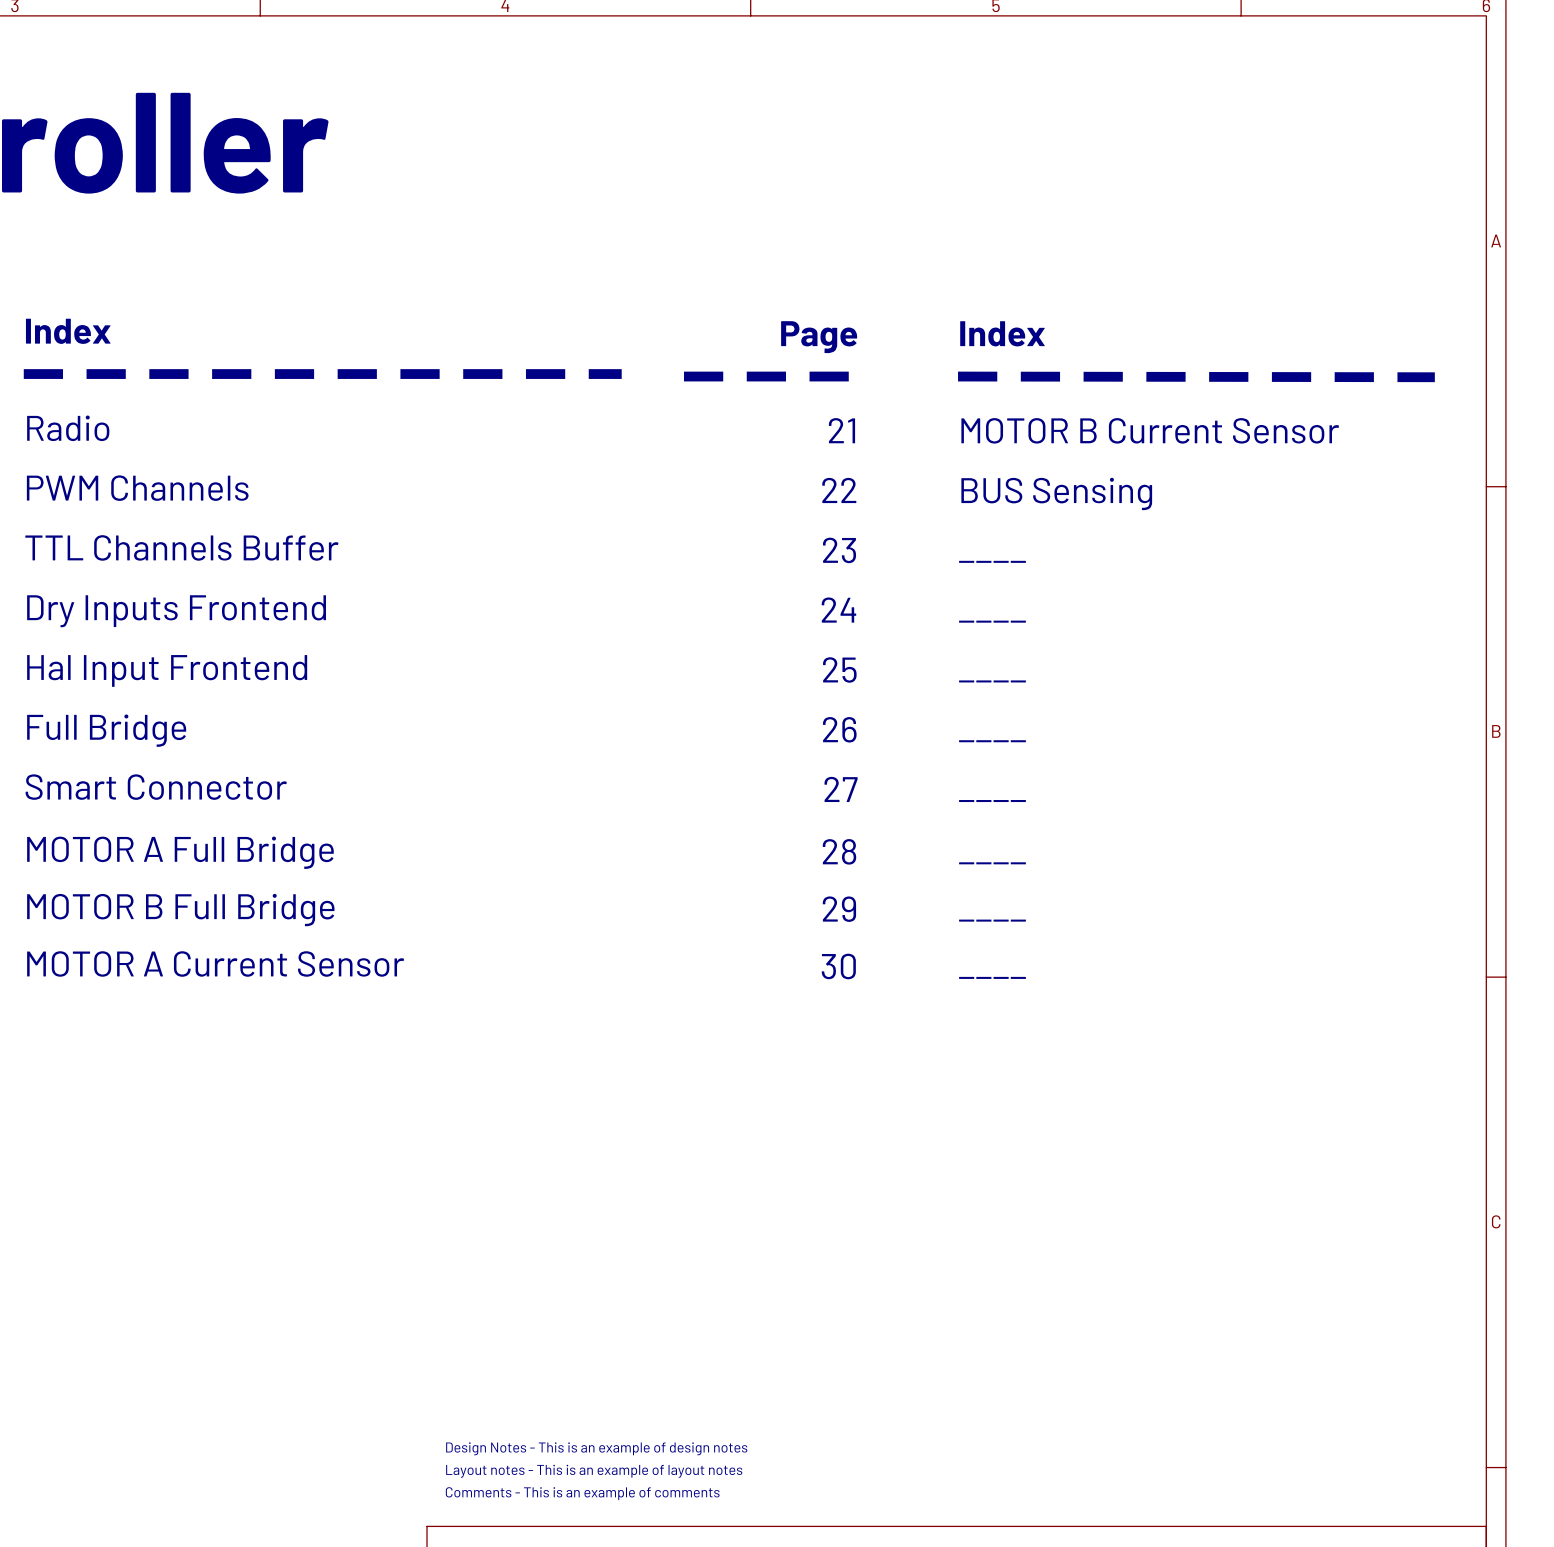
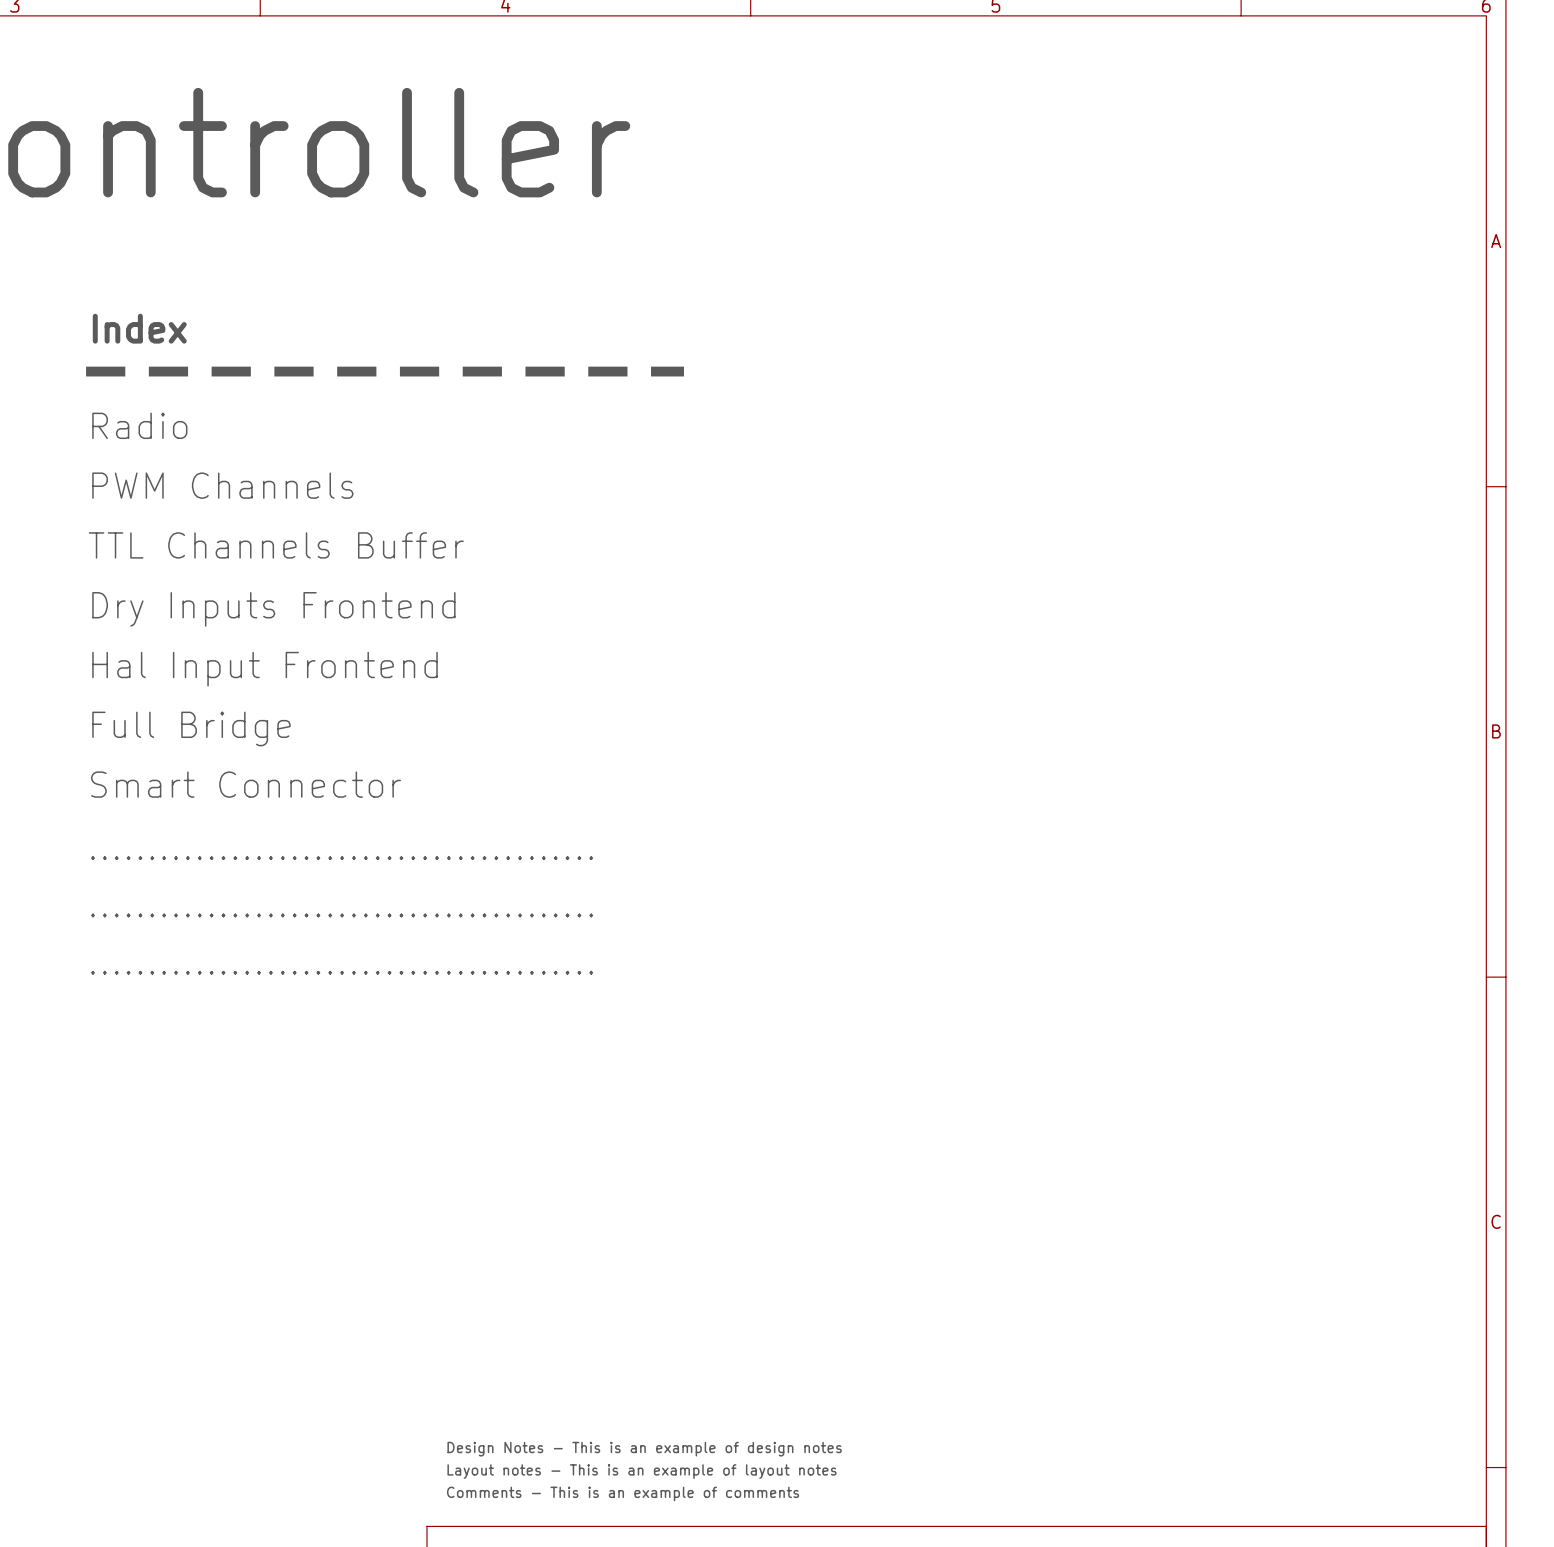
text position: Index (68, 331) -> Index (139, 328)
text: Index (1002, 333) -> none
text: Page (819, 337) -> none
line: (23, 374) (621, 374) -> (86, 371) (683, 371)
line: (683, 376) (858, 376) -> none
line: (958, 376) (1434, 377) -> none
text position: Radio (68, 428) -> Radio (139, 425)
text: 21 (841, 430) -> none
text: MOTOR B Current Sensor (1150, 430) -> none
text position: PWM Channels (137, 488) -> PWM Channels (222, 485)
text: 22 (839, 490) -> none
text: BUS Sensing (1056, 493) -> none
text position: TTL Channels Buffer (181, 547) -> TTL Channels Buffer (276, 545)
text: 23 (839, 550) -> none
text: ____ (992, 561) -> none
text: 24 (838, 610) -> none
text position: Dry Inputs Frontend (176, 611) -> Dry Inputs Frontend (273, 609)
text: ____ (992, 621) -> none
text: 25 (839, 669) -> none
text position: Hal Input Frontend (167, 670) -> Hal Input Frontend (265, 669)
text: ____ (992, 681) -> none
text: 26 (839, 729) -> none
text position: Full Bridge (106, 730) -> Full Bridge (191, 728)
text: ____ (992, 741) -> none
text position: Smart Connector (156, 787) -> Smart Connector (246, 784)
text: 27 (841, 789) -> none
text: ____ (992, 801) -> none
text: 28 (839, 851) -> none
text: MOTOR A Full Bridge (180, 852) -> none
text: none -> ........................................... (342, 858)
text: ____ (992, 863) -> none
text: 29 (839, 909) -> none
text: MOTOR B Full Bridge (180, 910) -> none
text: none -> ........................................... (342, 915)
text: ____ (992, 920) -> none
text: MOTOR A Current Sensor (215, 964) -> none
text: 30 (838, 966) -> none
text: none -> ........................................... (342, 972)
text: ____ (992, 977) -> none

